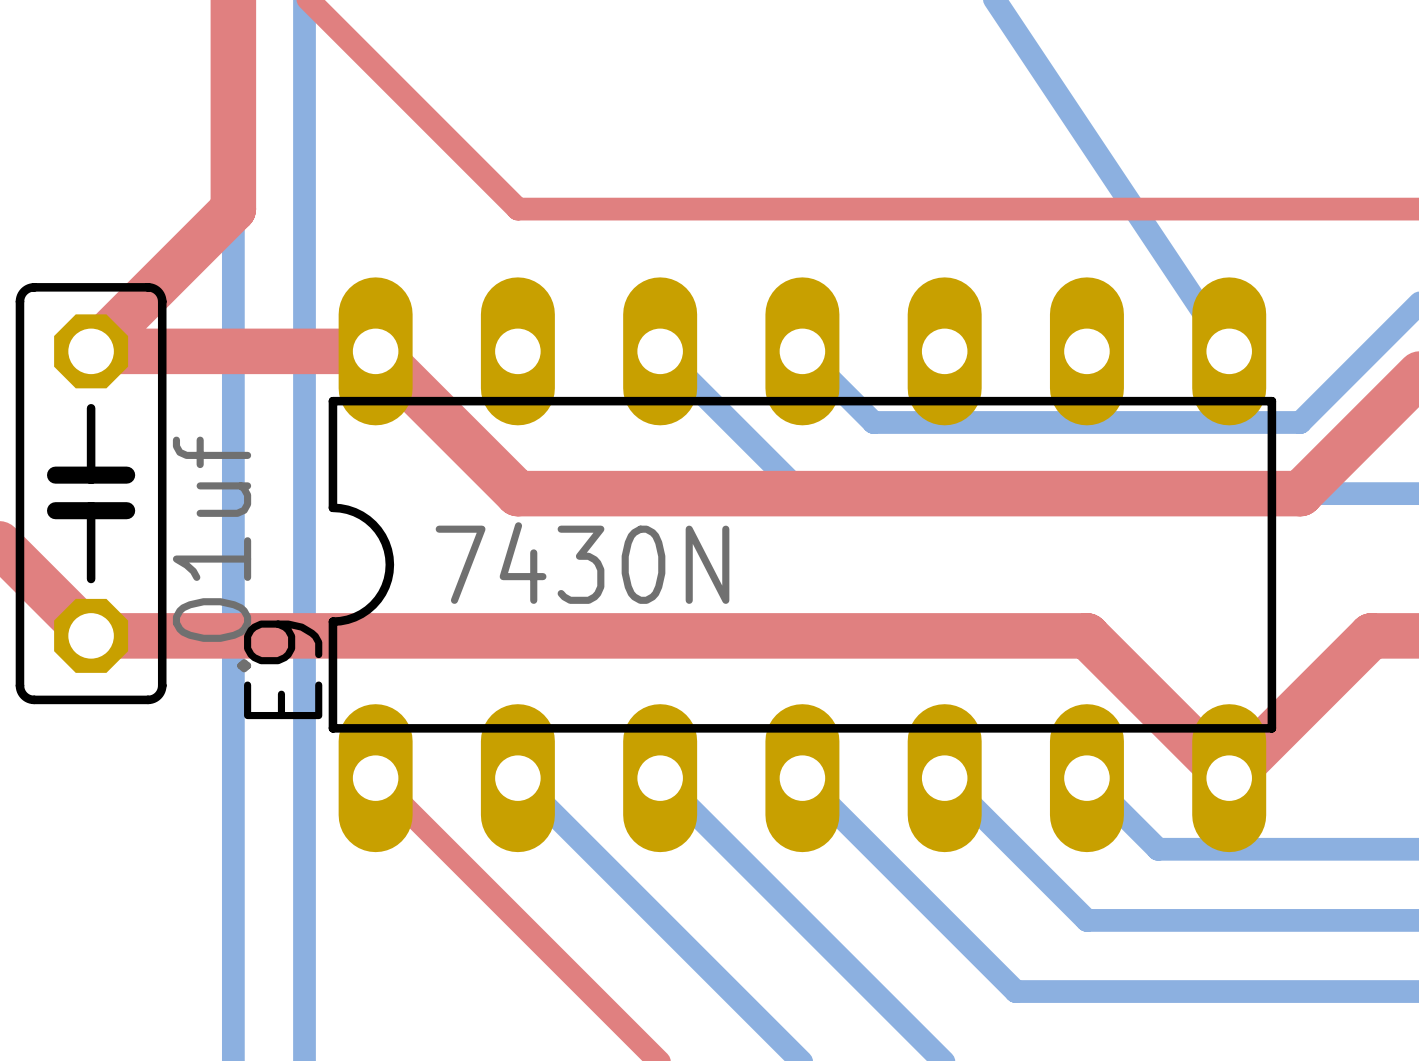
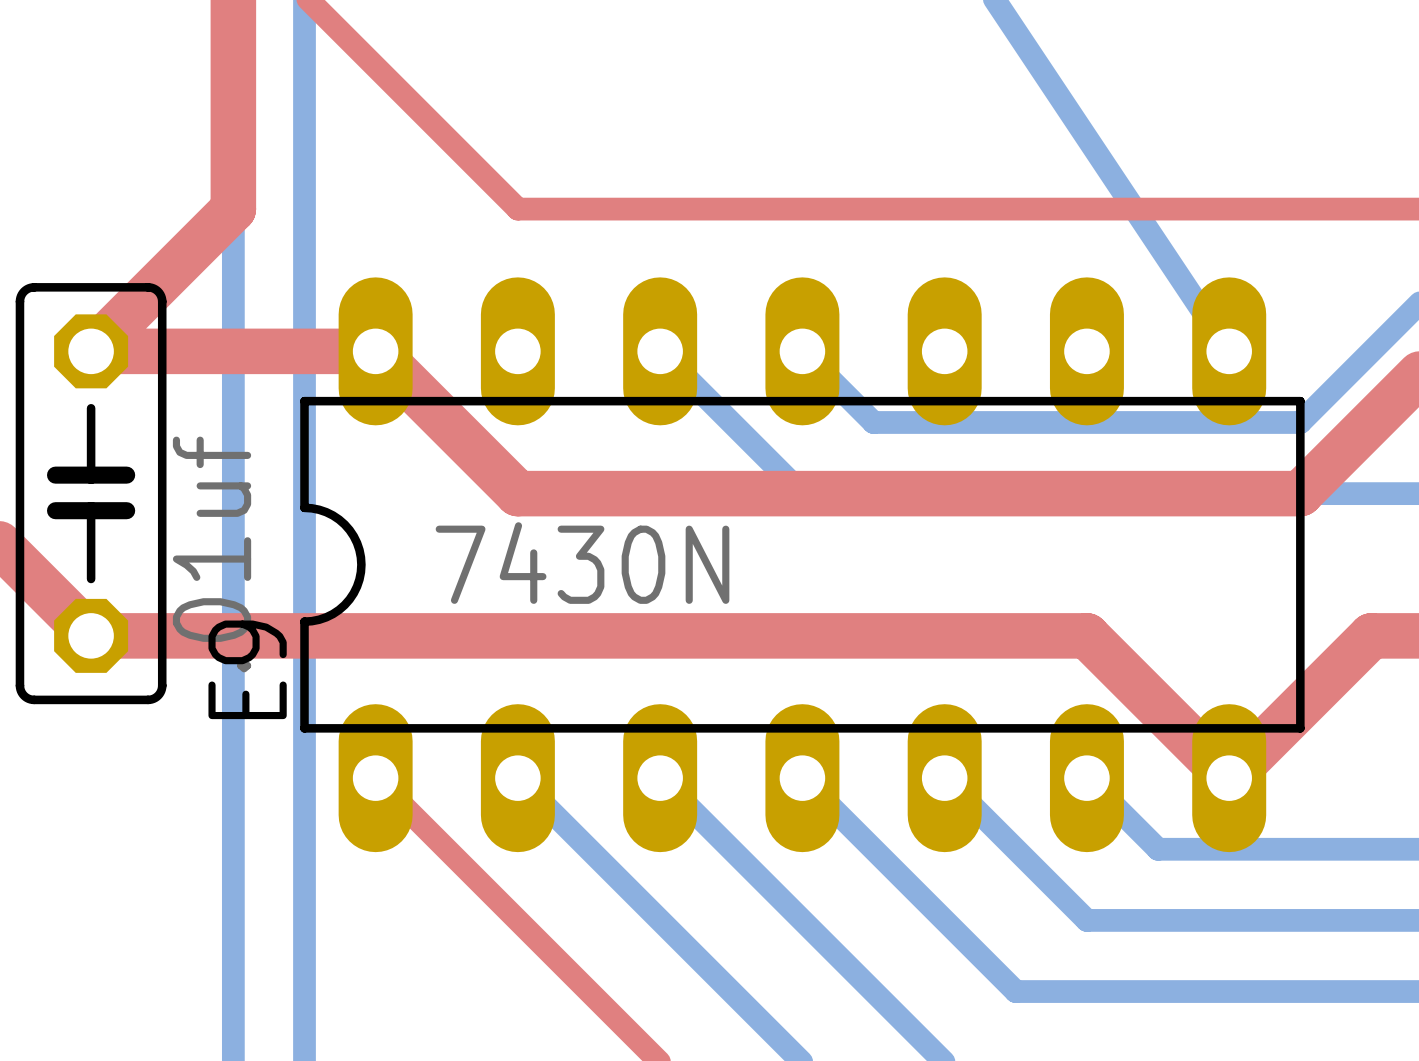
E9 footprint: [328, 277, 1277, 853] -> [300, 277, 1305, 853]
E9 name position: E9 (283, 669) -> E9 (247, 669)

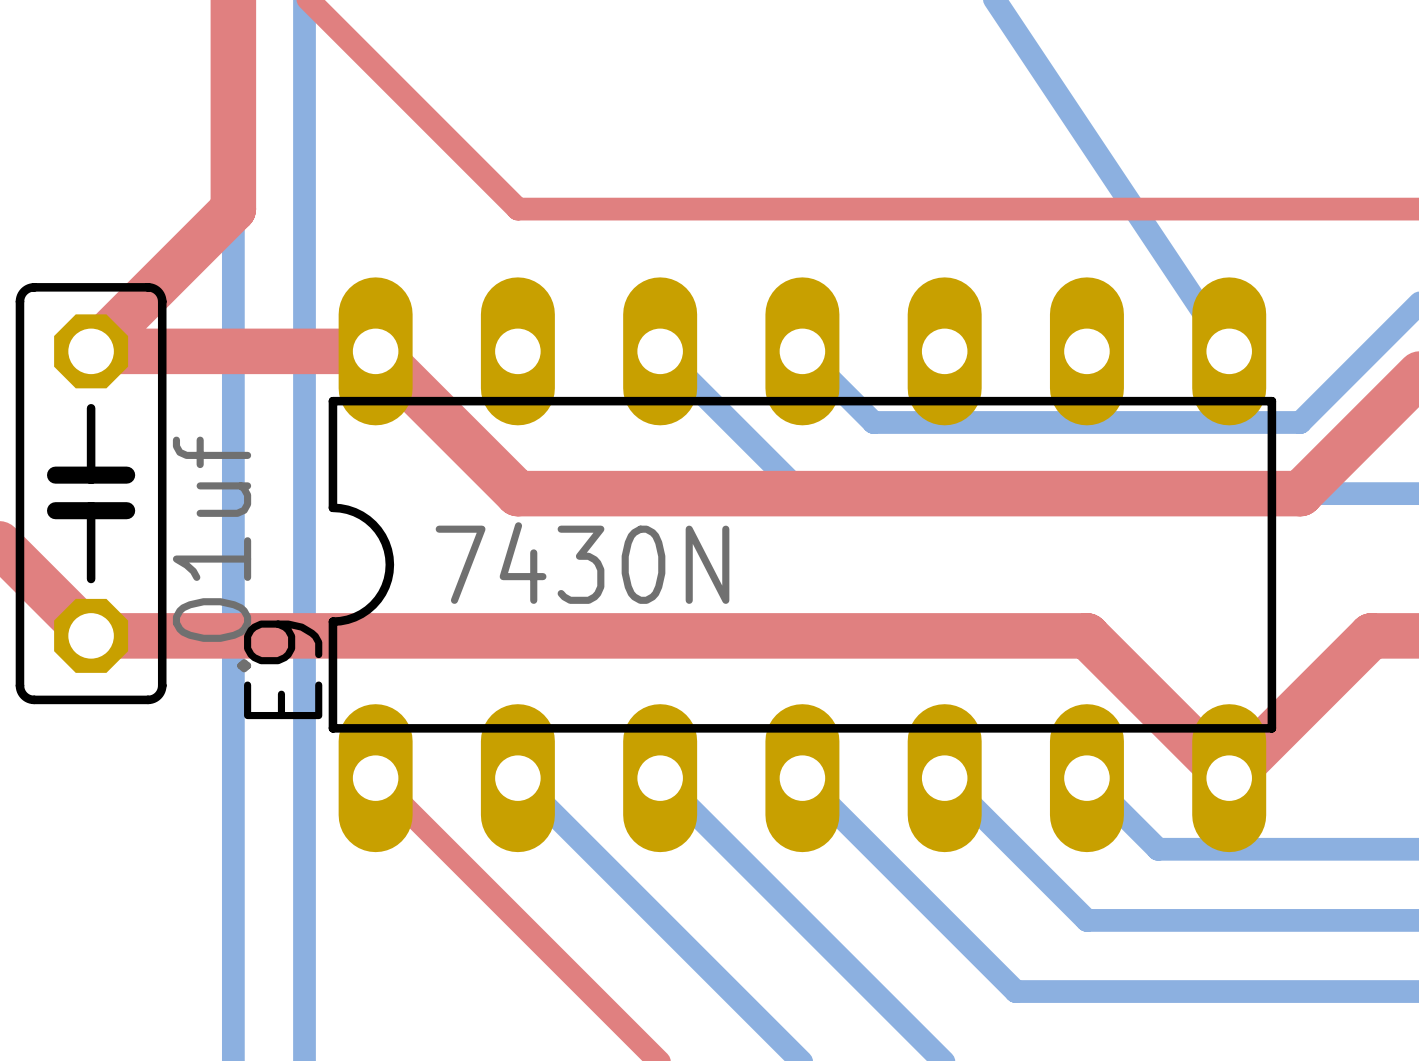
E9 footprint: [300, 277, 1305, 853] -> [328, 277, 1277, 853]
E9 name position: E9 (247, 669) -> E9 (283, 669)

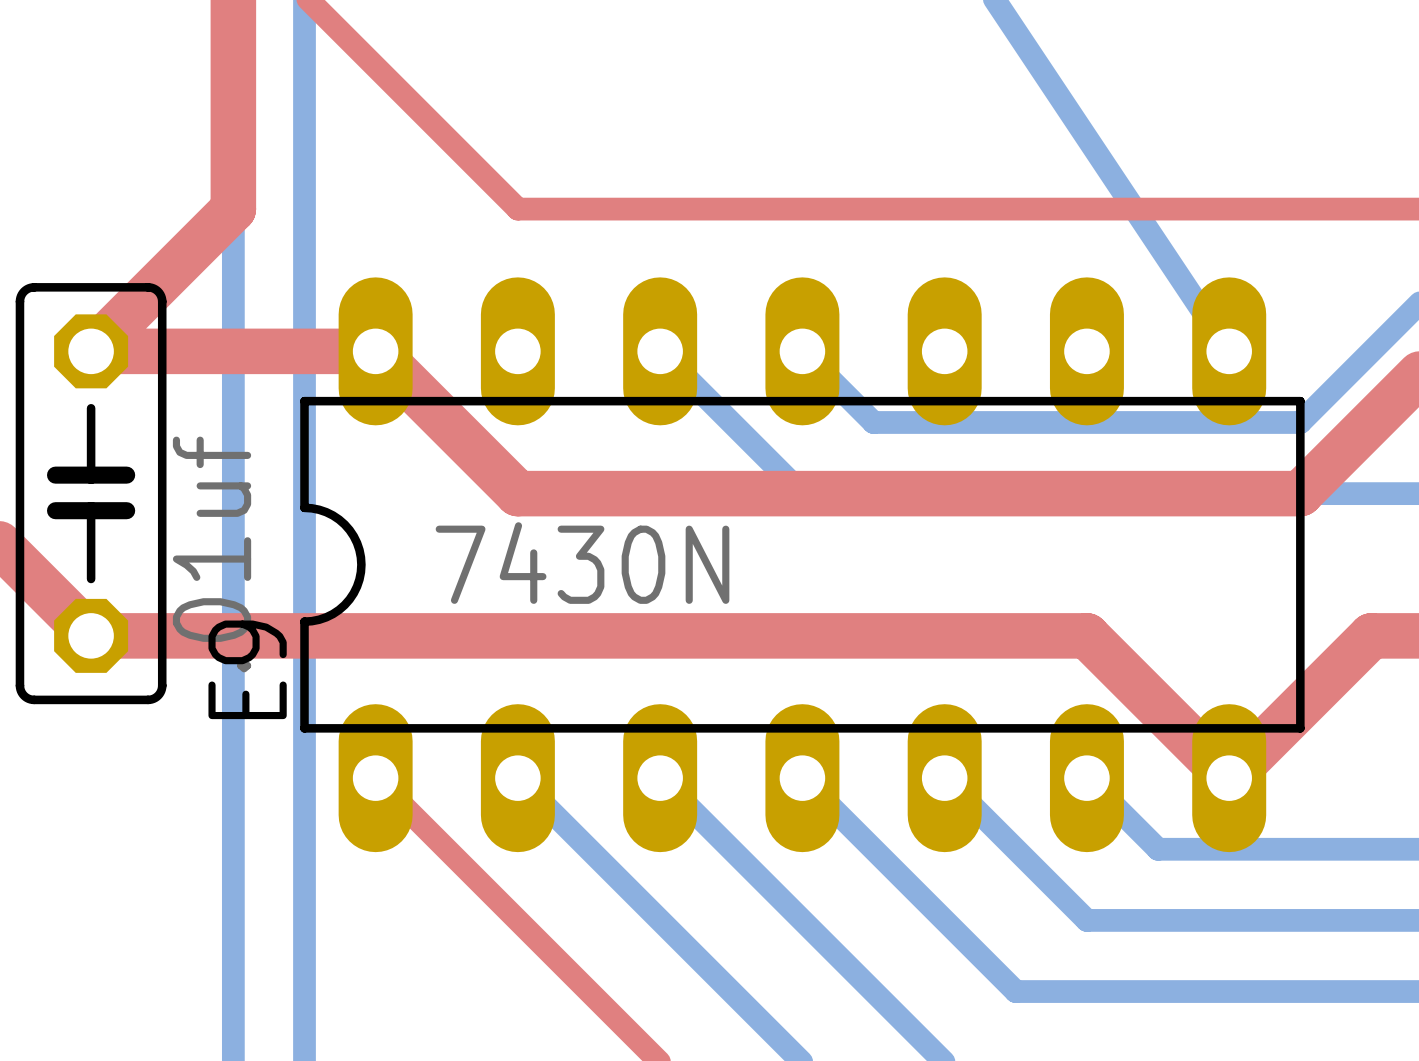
E9 footprint: [328, 277, 1277, 853] -> [300, 277, 1305, 853]
E9 name position: E9 (283, 669) -> E9 (247, 669)

